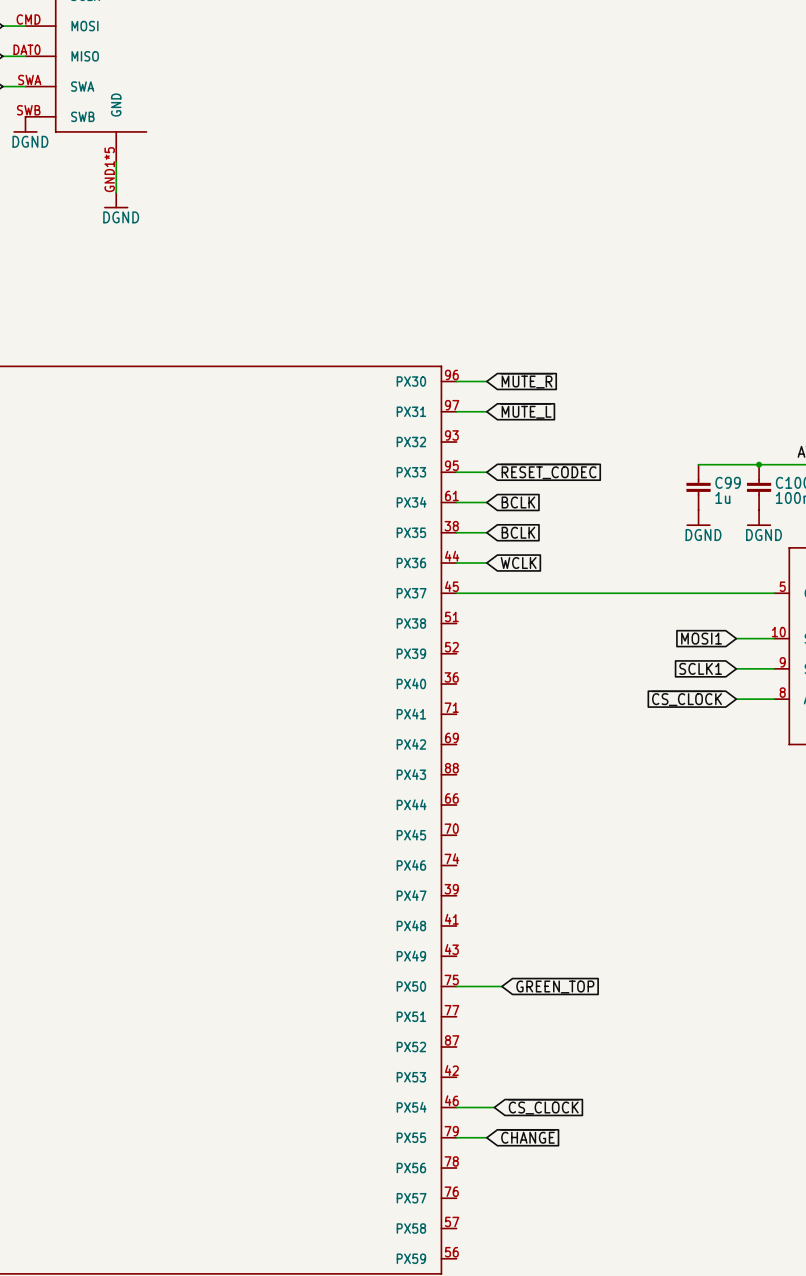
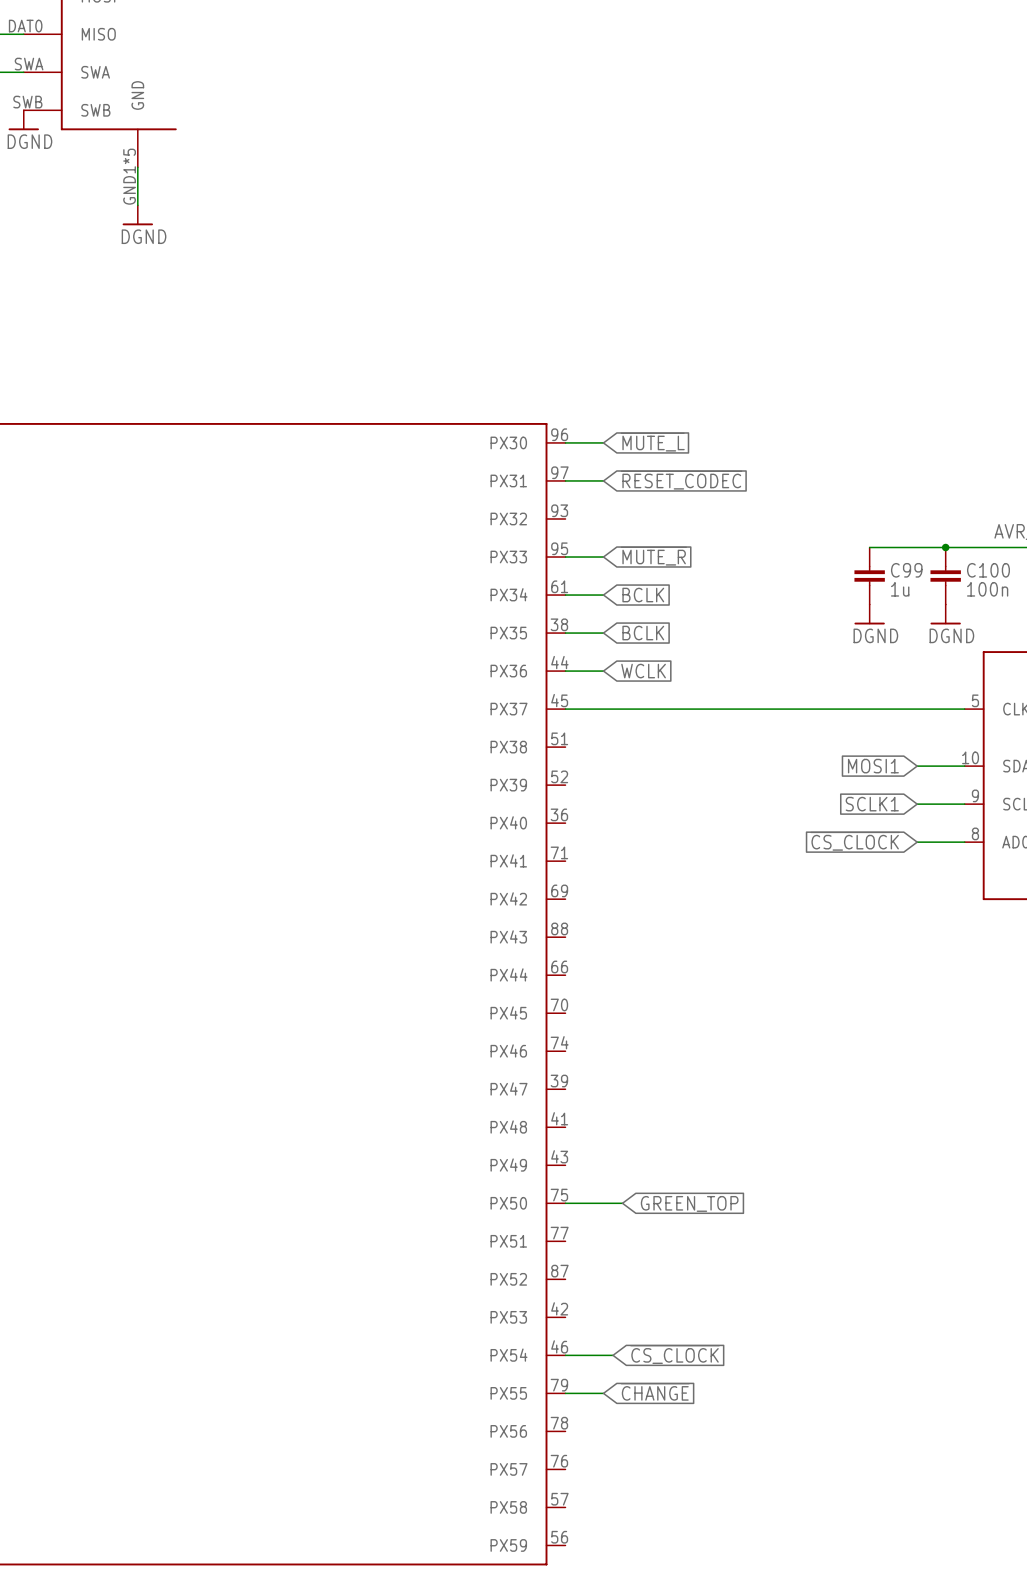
global label: ~{MUTE_R} (526, 380) -> ~{MUTE_L} (652, 442)
global label: ~{MUTE_L} (525, 411) -> ~{RESET_CODEC} (681, 480)
global label: ~{RESET_CODEC} (548, 471) -> ~{MUTE_R} (653, 556)

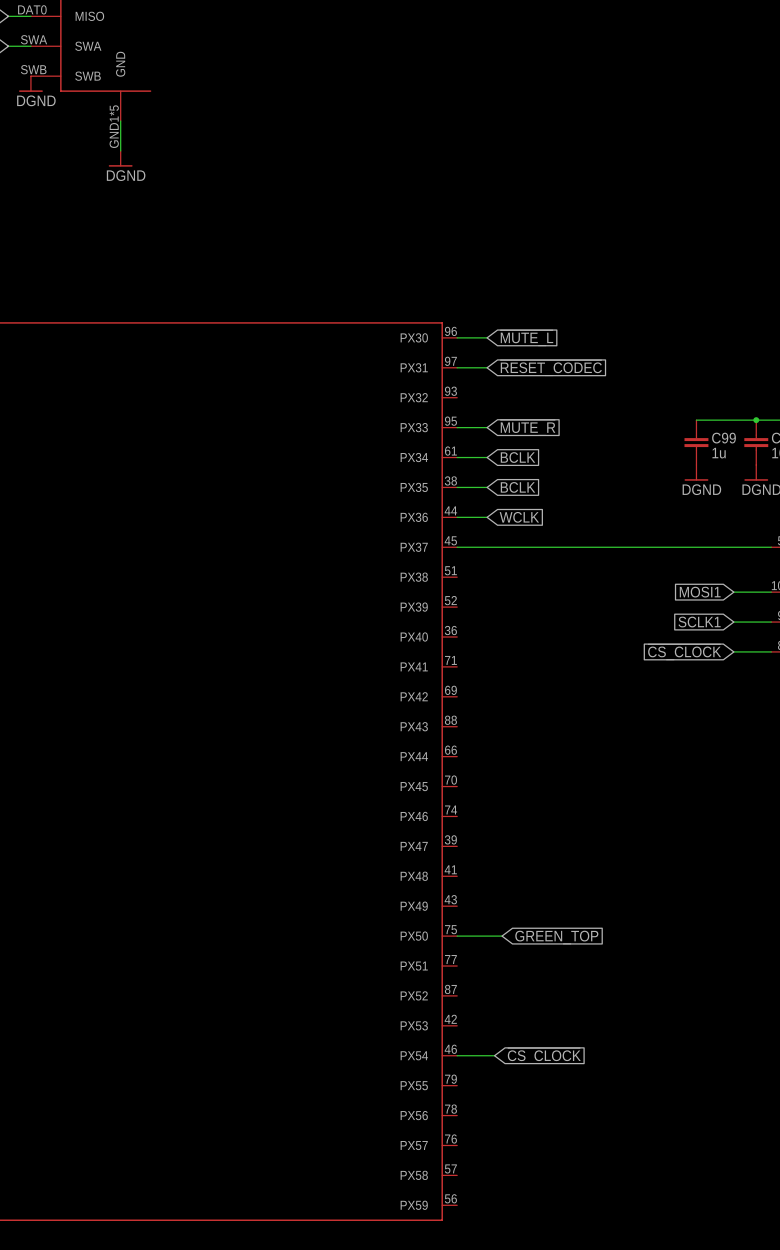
global label: ~{CHANGE} (655, 1391) -> none
wire: (565, 1393) (603, 1393) -> none

